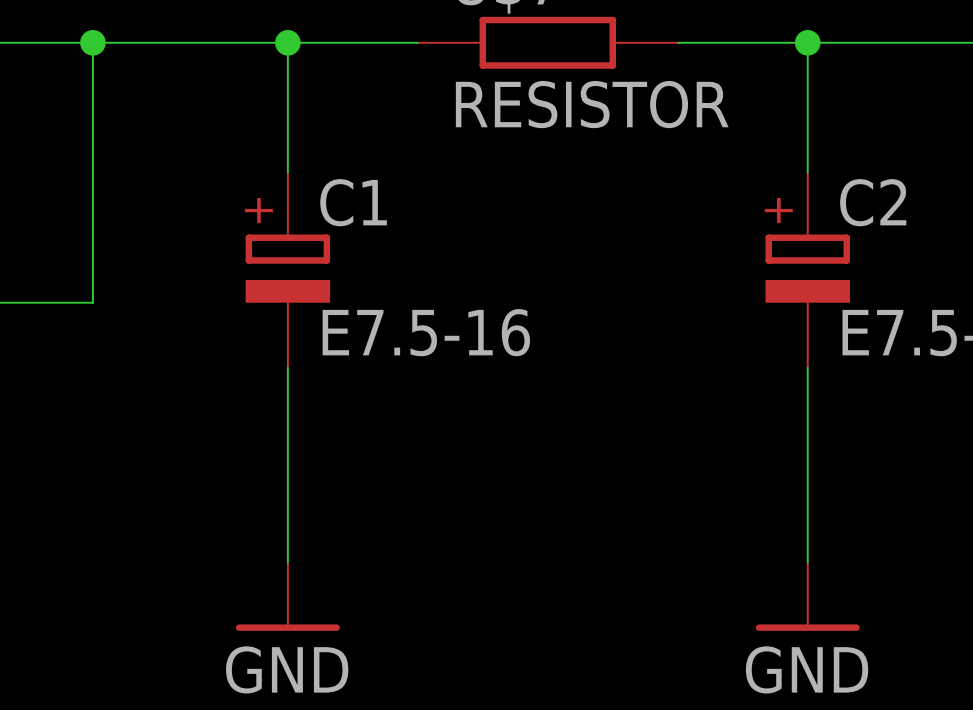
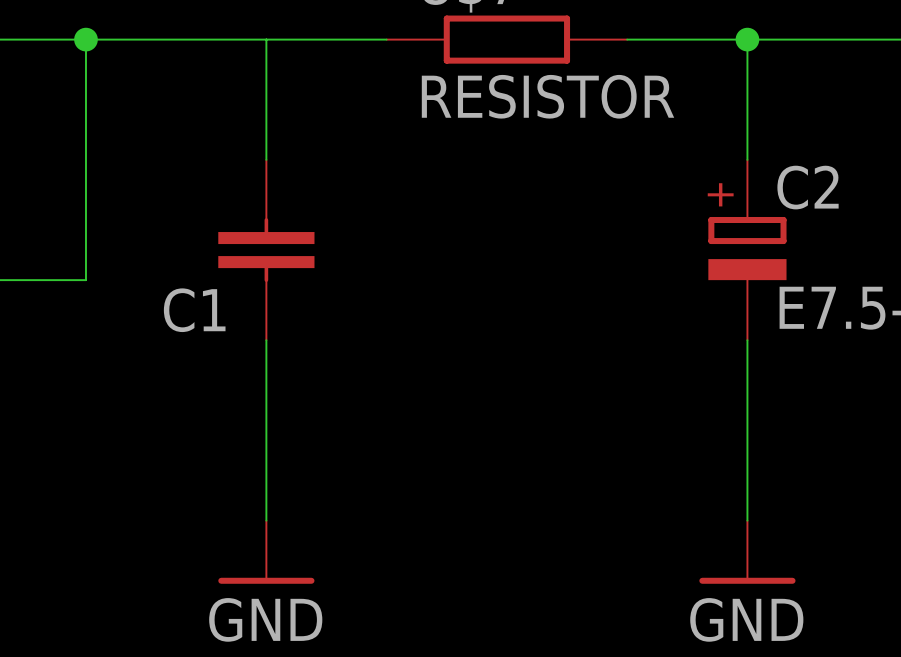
junction: (287, 42) -> none
C1 symbol: [245, 172, 331, 368] -> [218, 159, 315, 341]
C1 name position: C1 (353, 202) -> C1 (194, 310)
C1 value: E7.5-16 (426, 332) -> none

